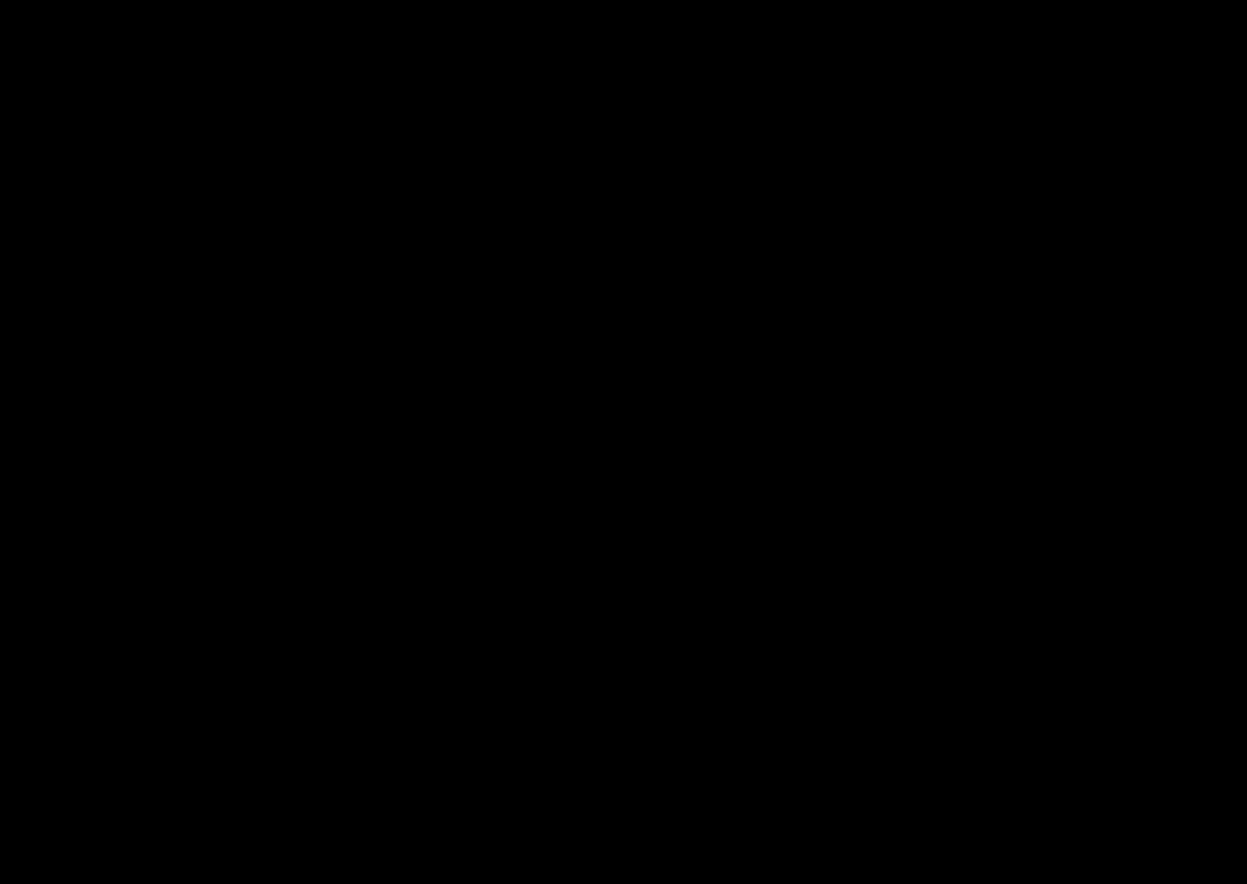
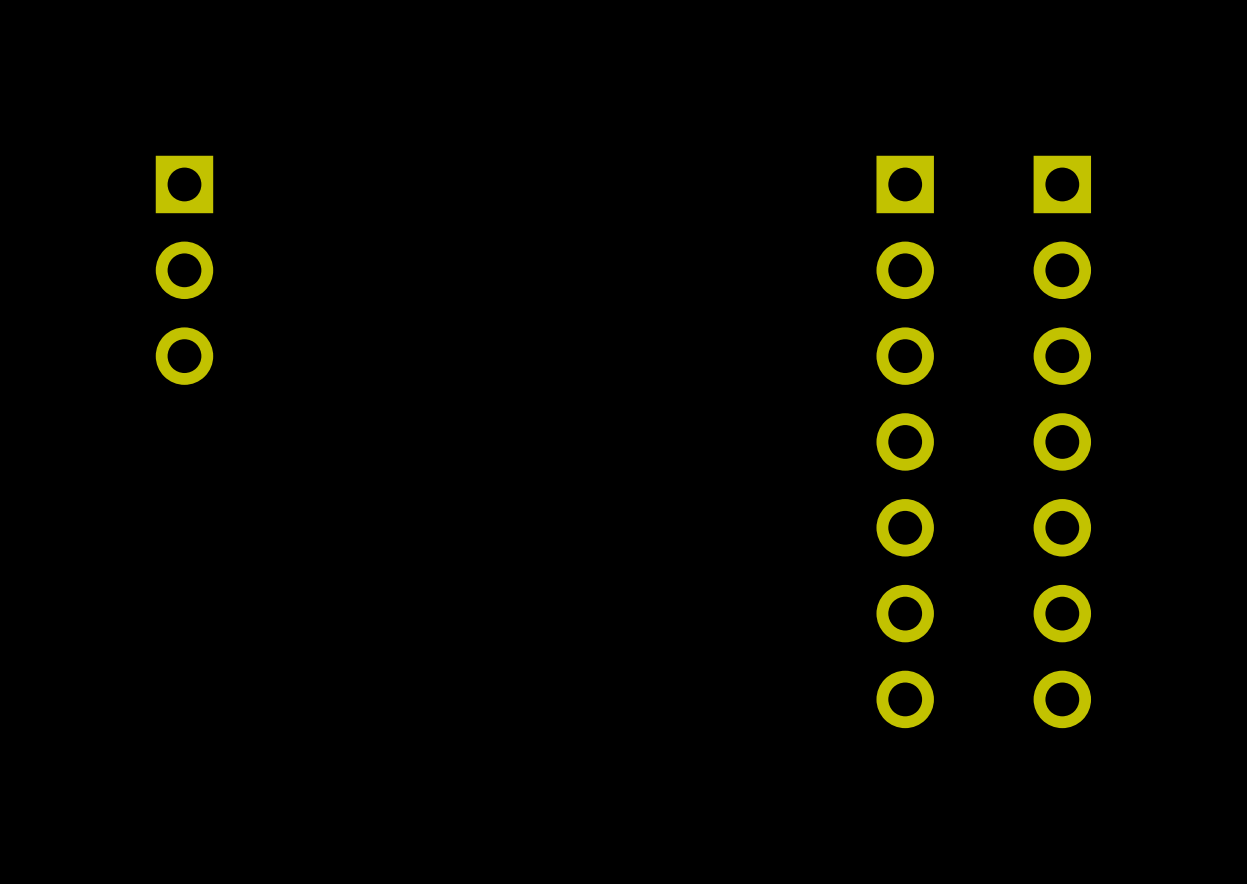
part: none -> (184, 270)
part: none -> (905, 441)
part: none -> (1062, 441)

